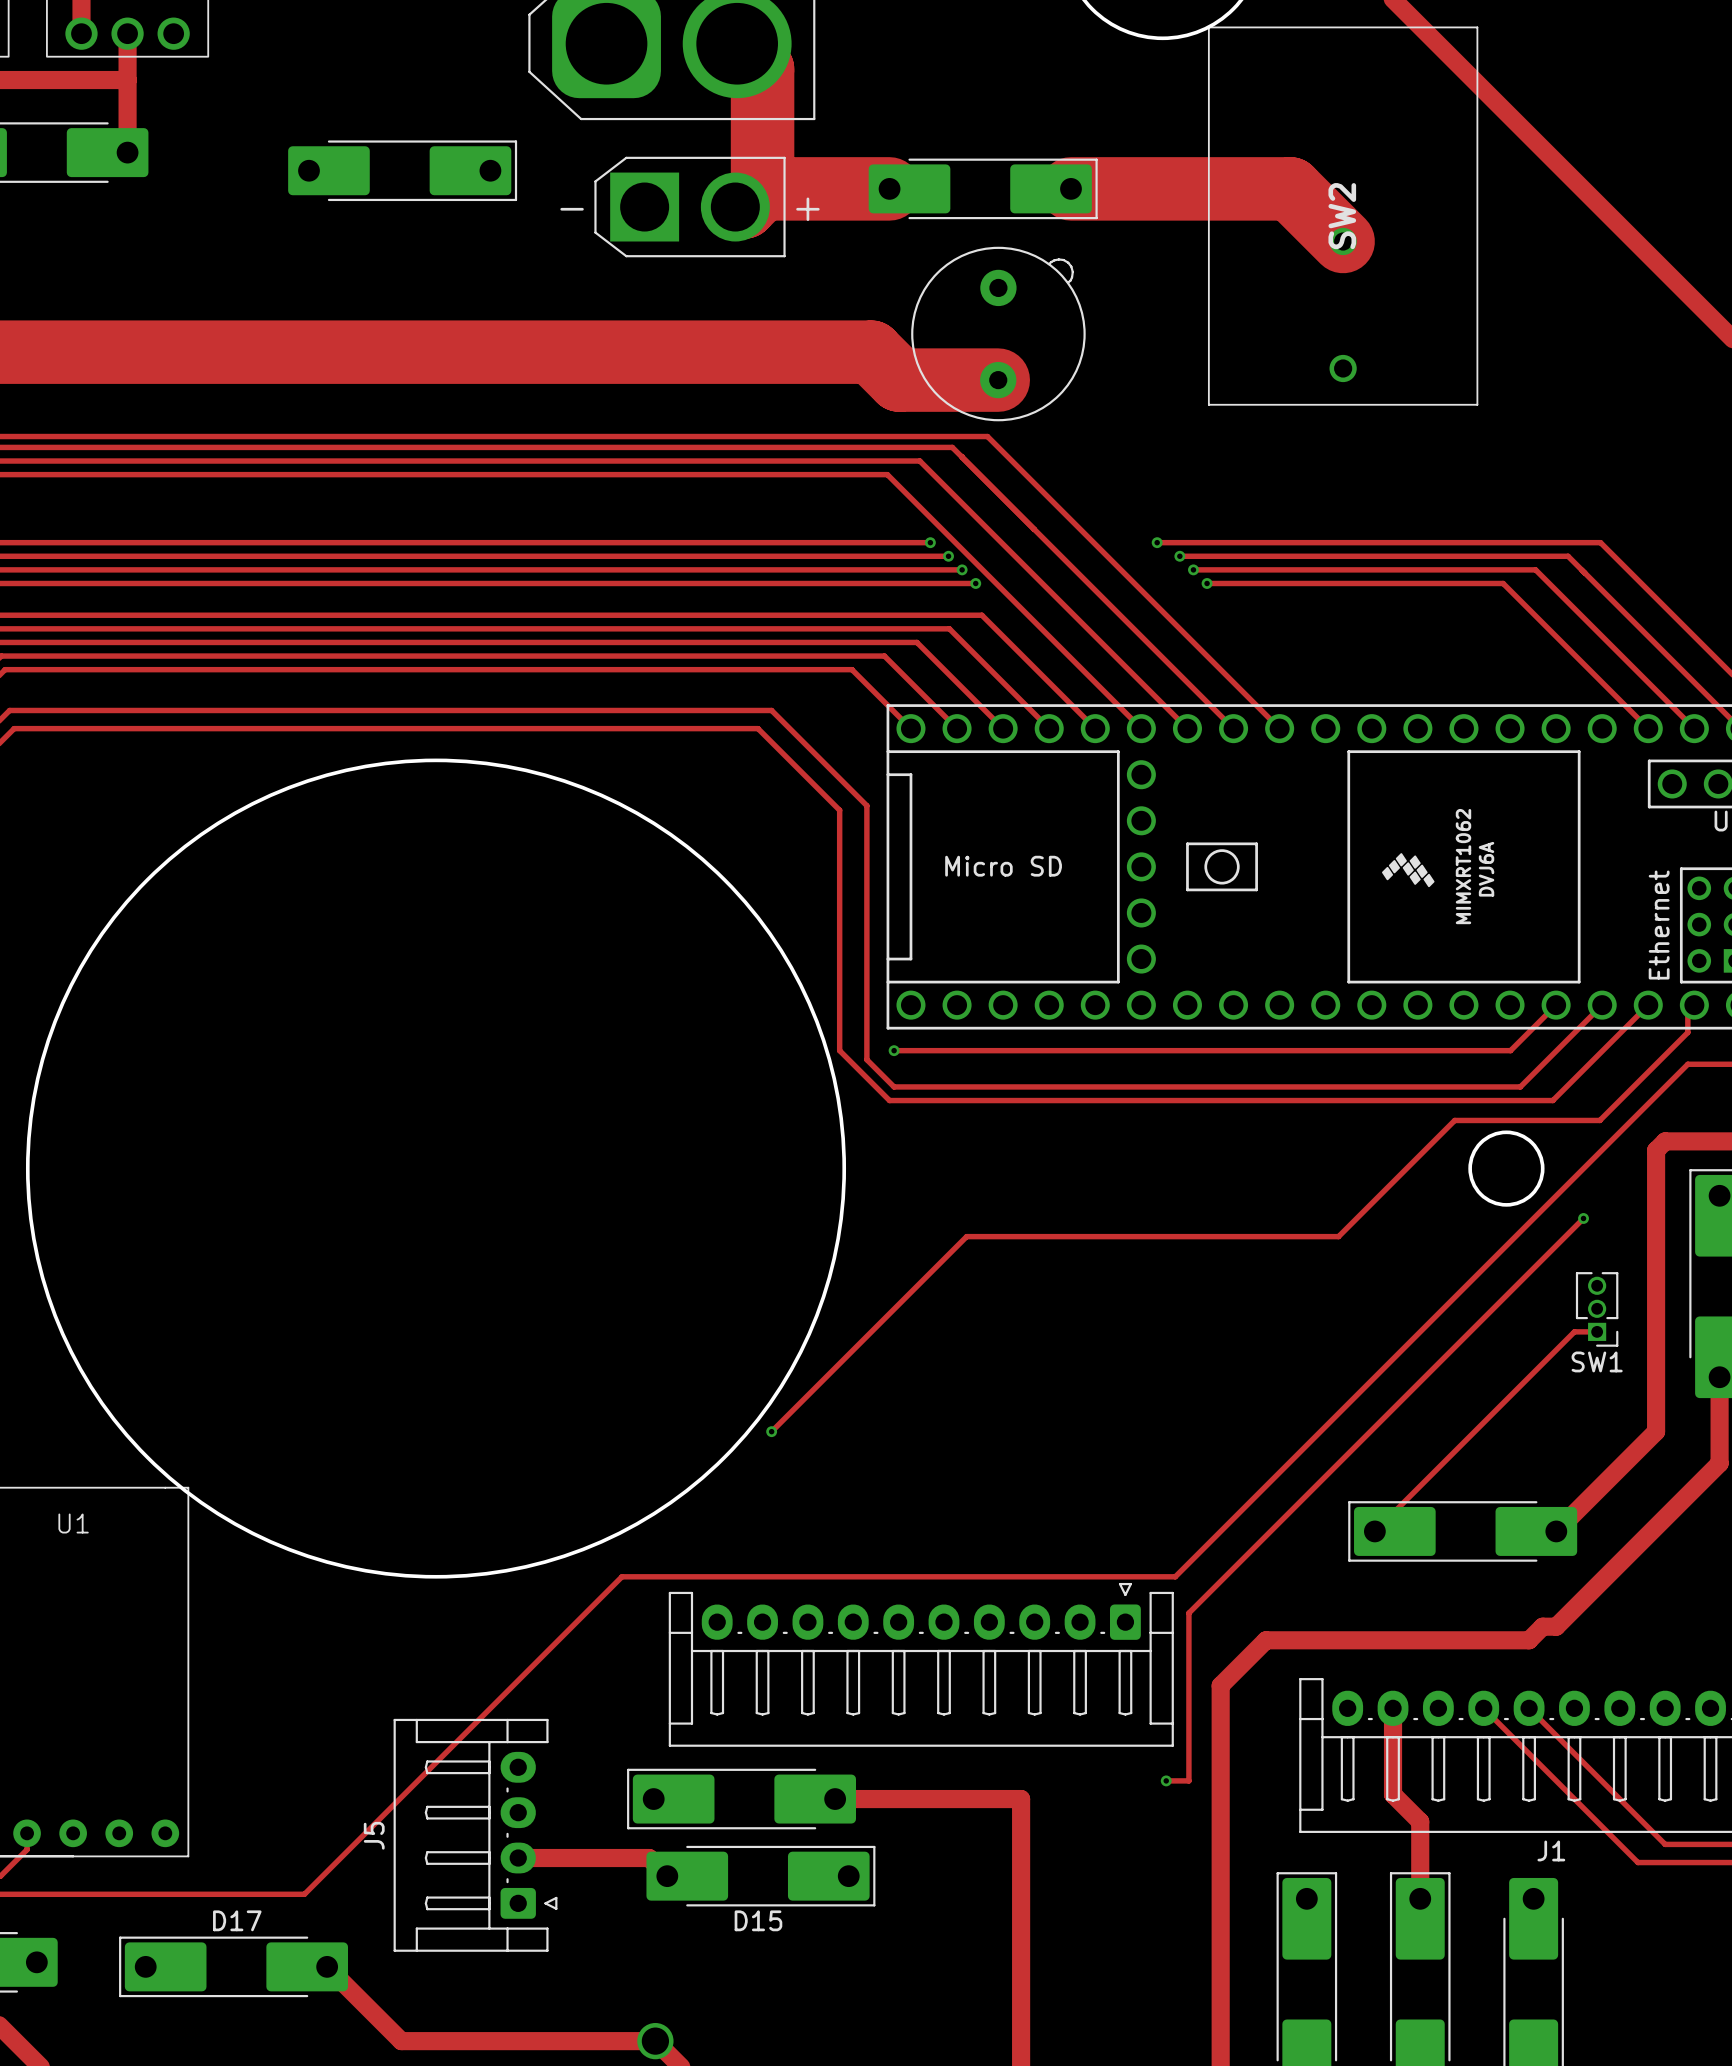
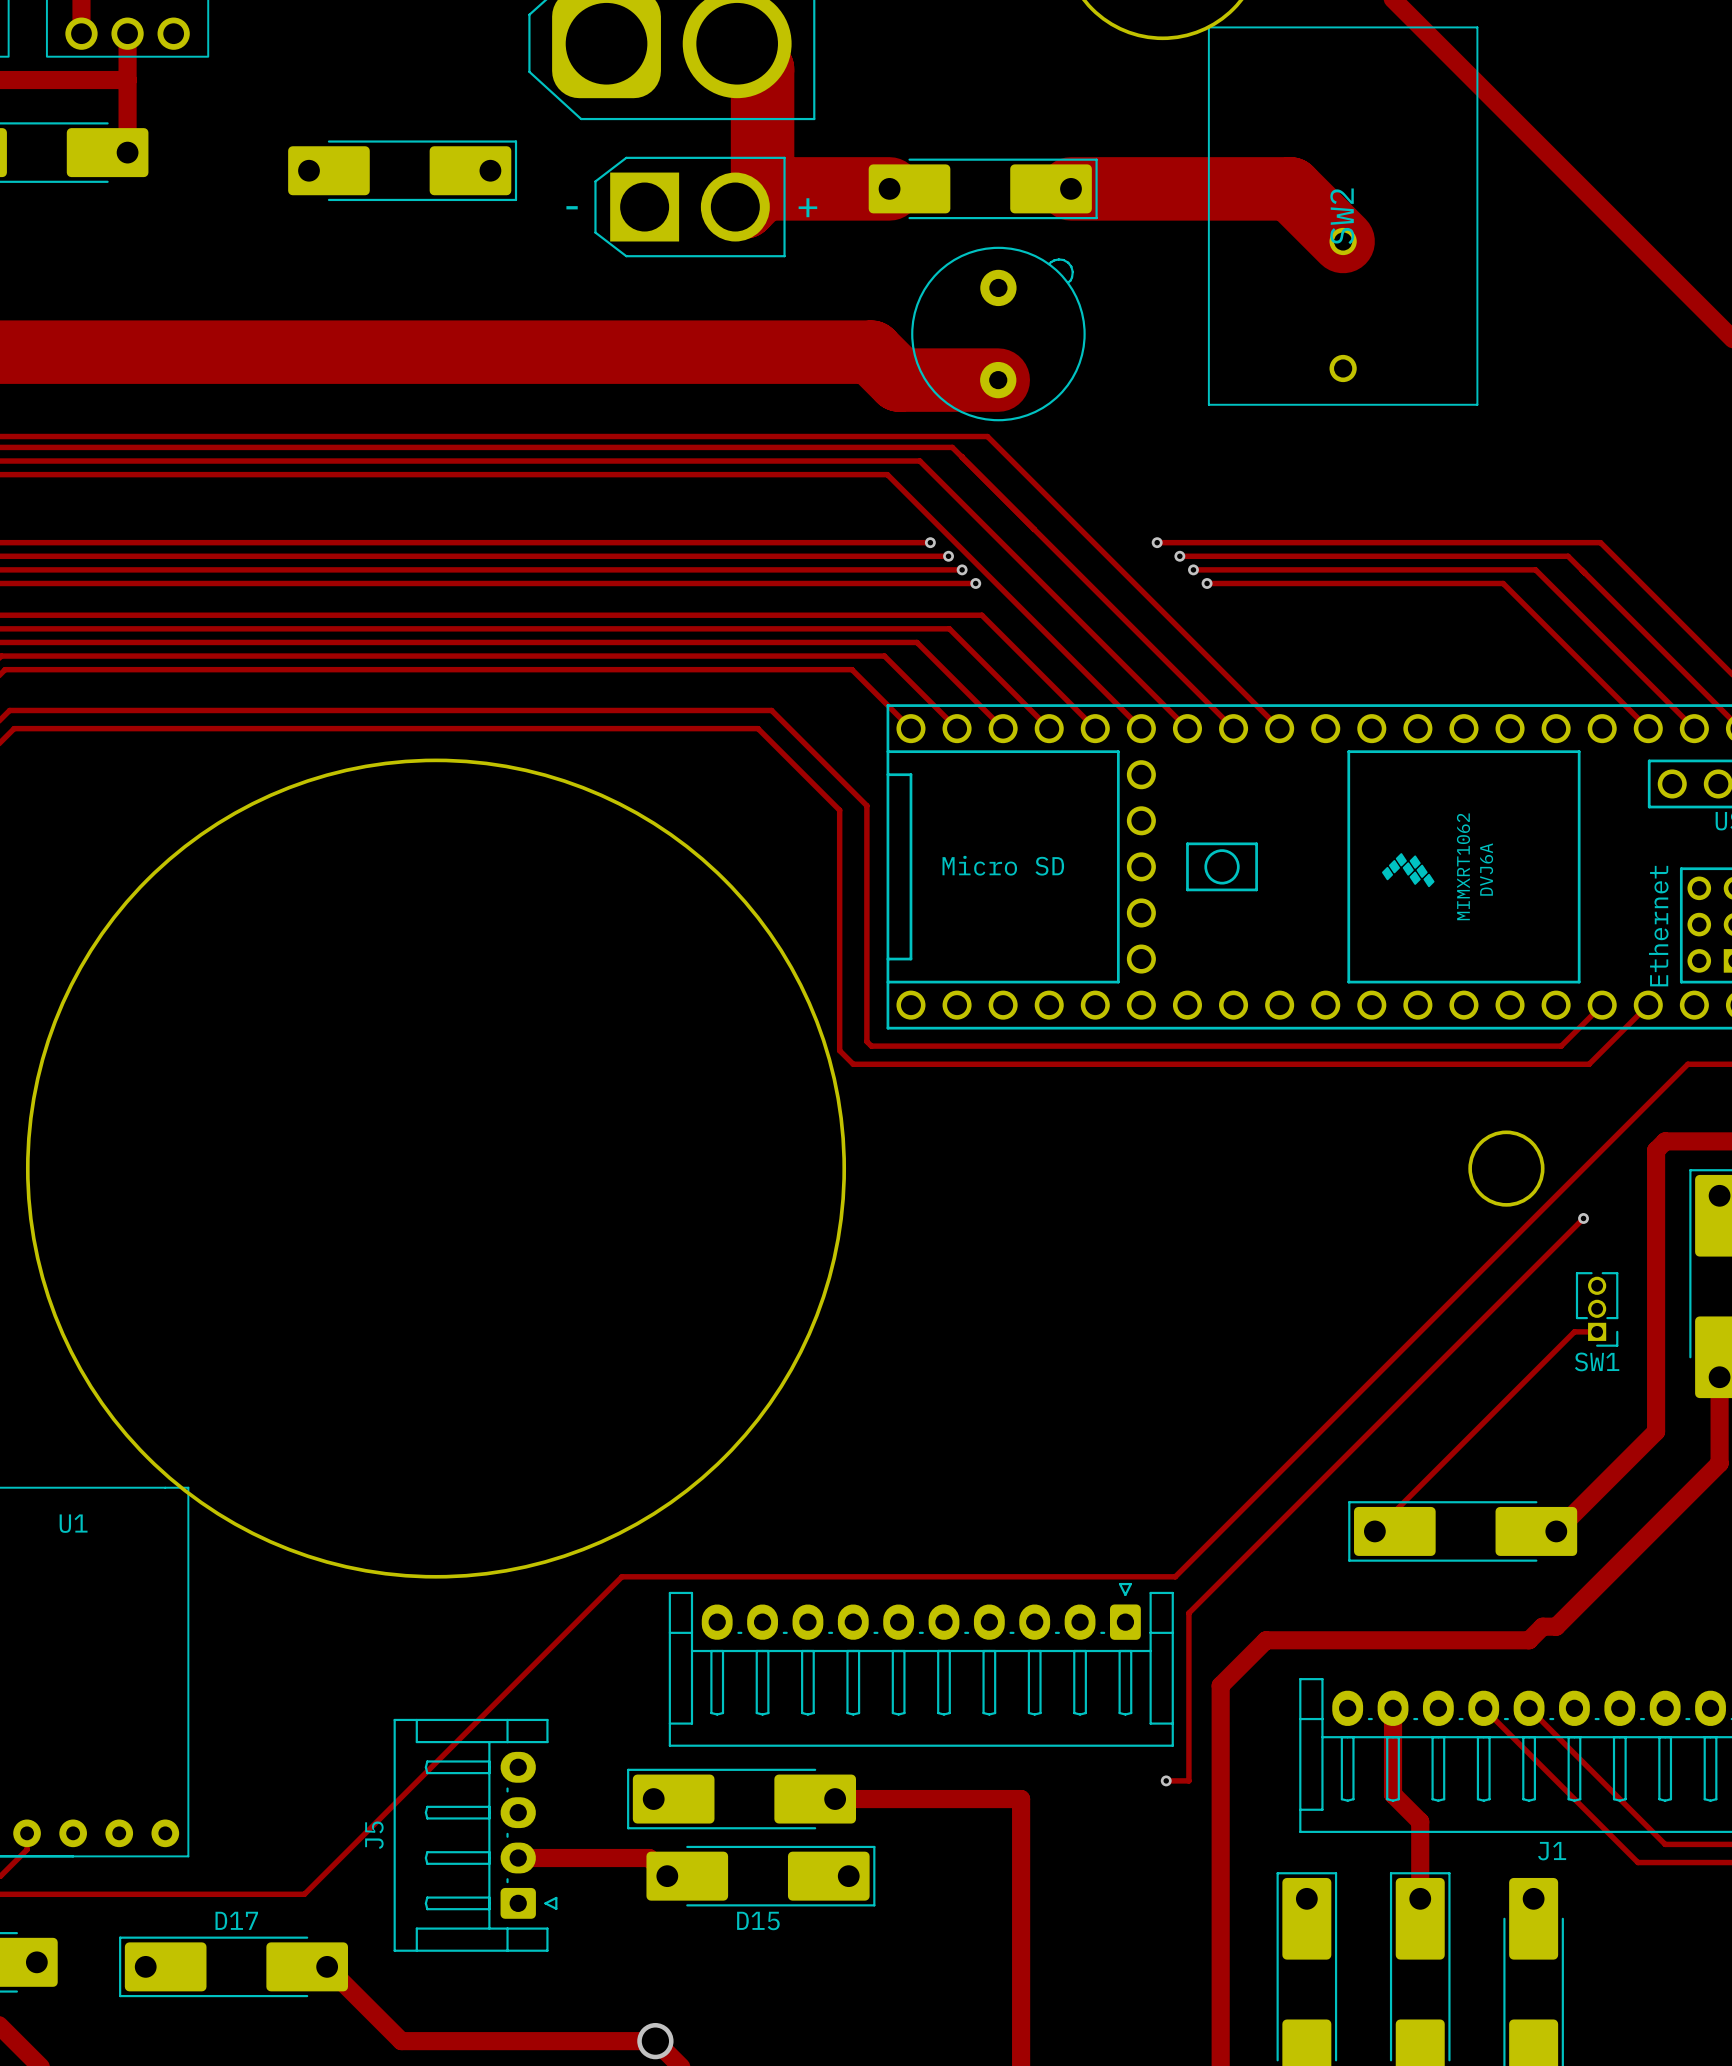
track: (1556, 1005) (1510, 1050) (894, 1050) -> none
track: (1687, 1005) (1687, 1032) (1599, 1120) (1454, 1120) (1338, 1236) (966, 1236) (771, 1431) -> none
track: (866, 1041) (866, 1059) (894, 1086) (1520, 1086) (1561, 1046) -> (866, 1041) (871, 1046) (1561, 1046)
via: (894, 1050) -> none
track: (853, 1064) (889, 1100) (1552, 1100) (1589, 1064) -> (853, 1064) (1589, 1064)
via: (771, 1431) -> none

